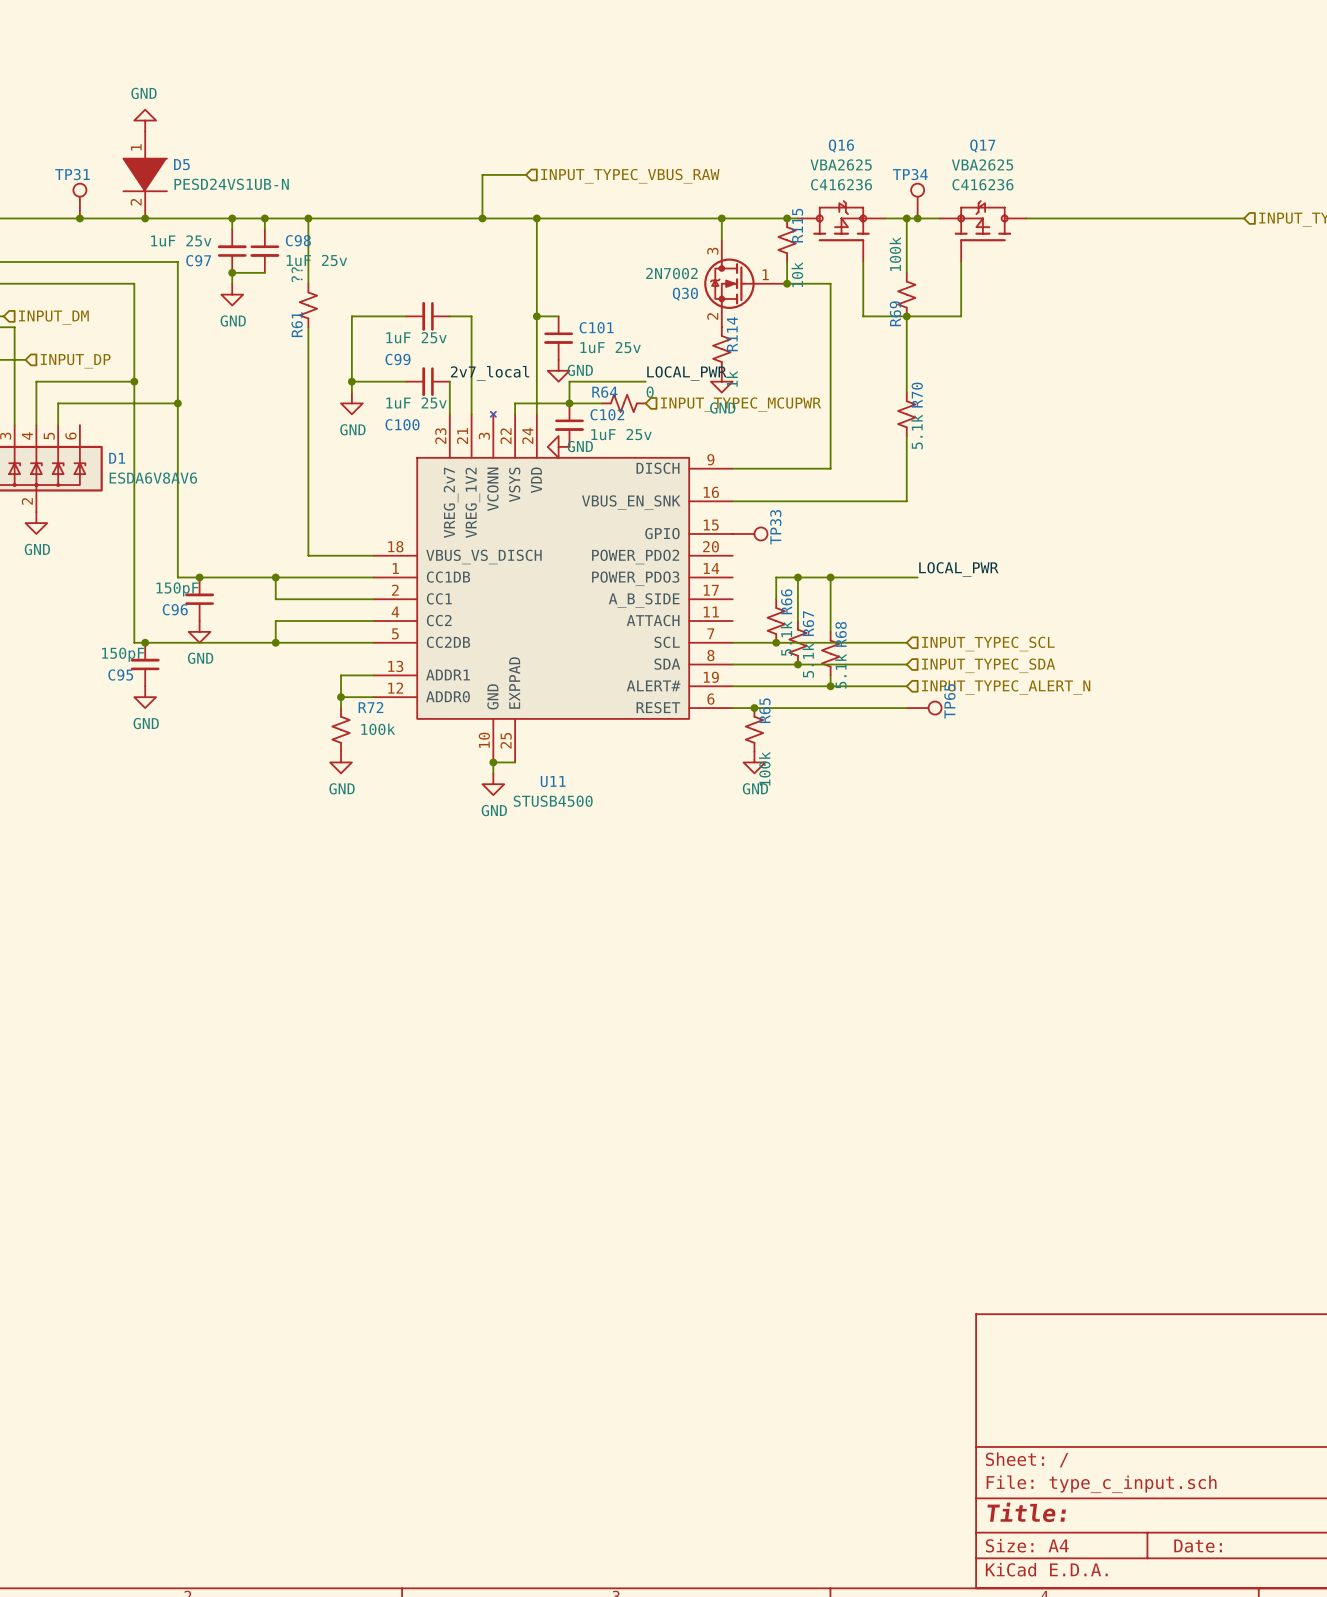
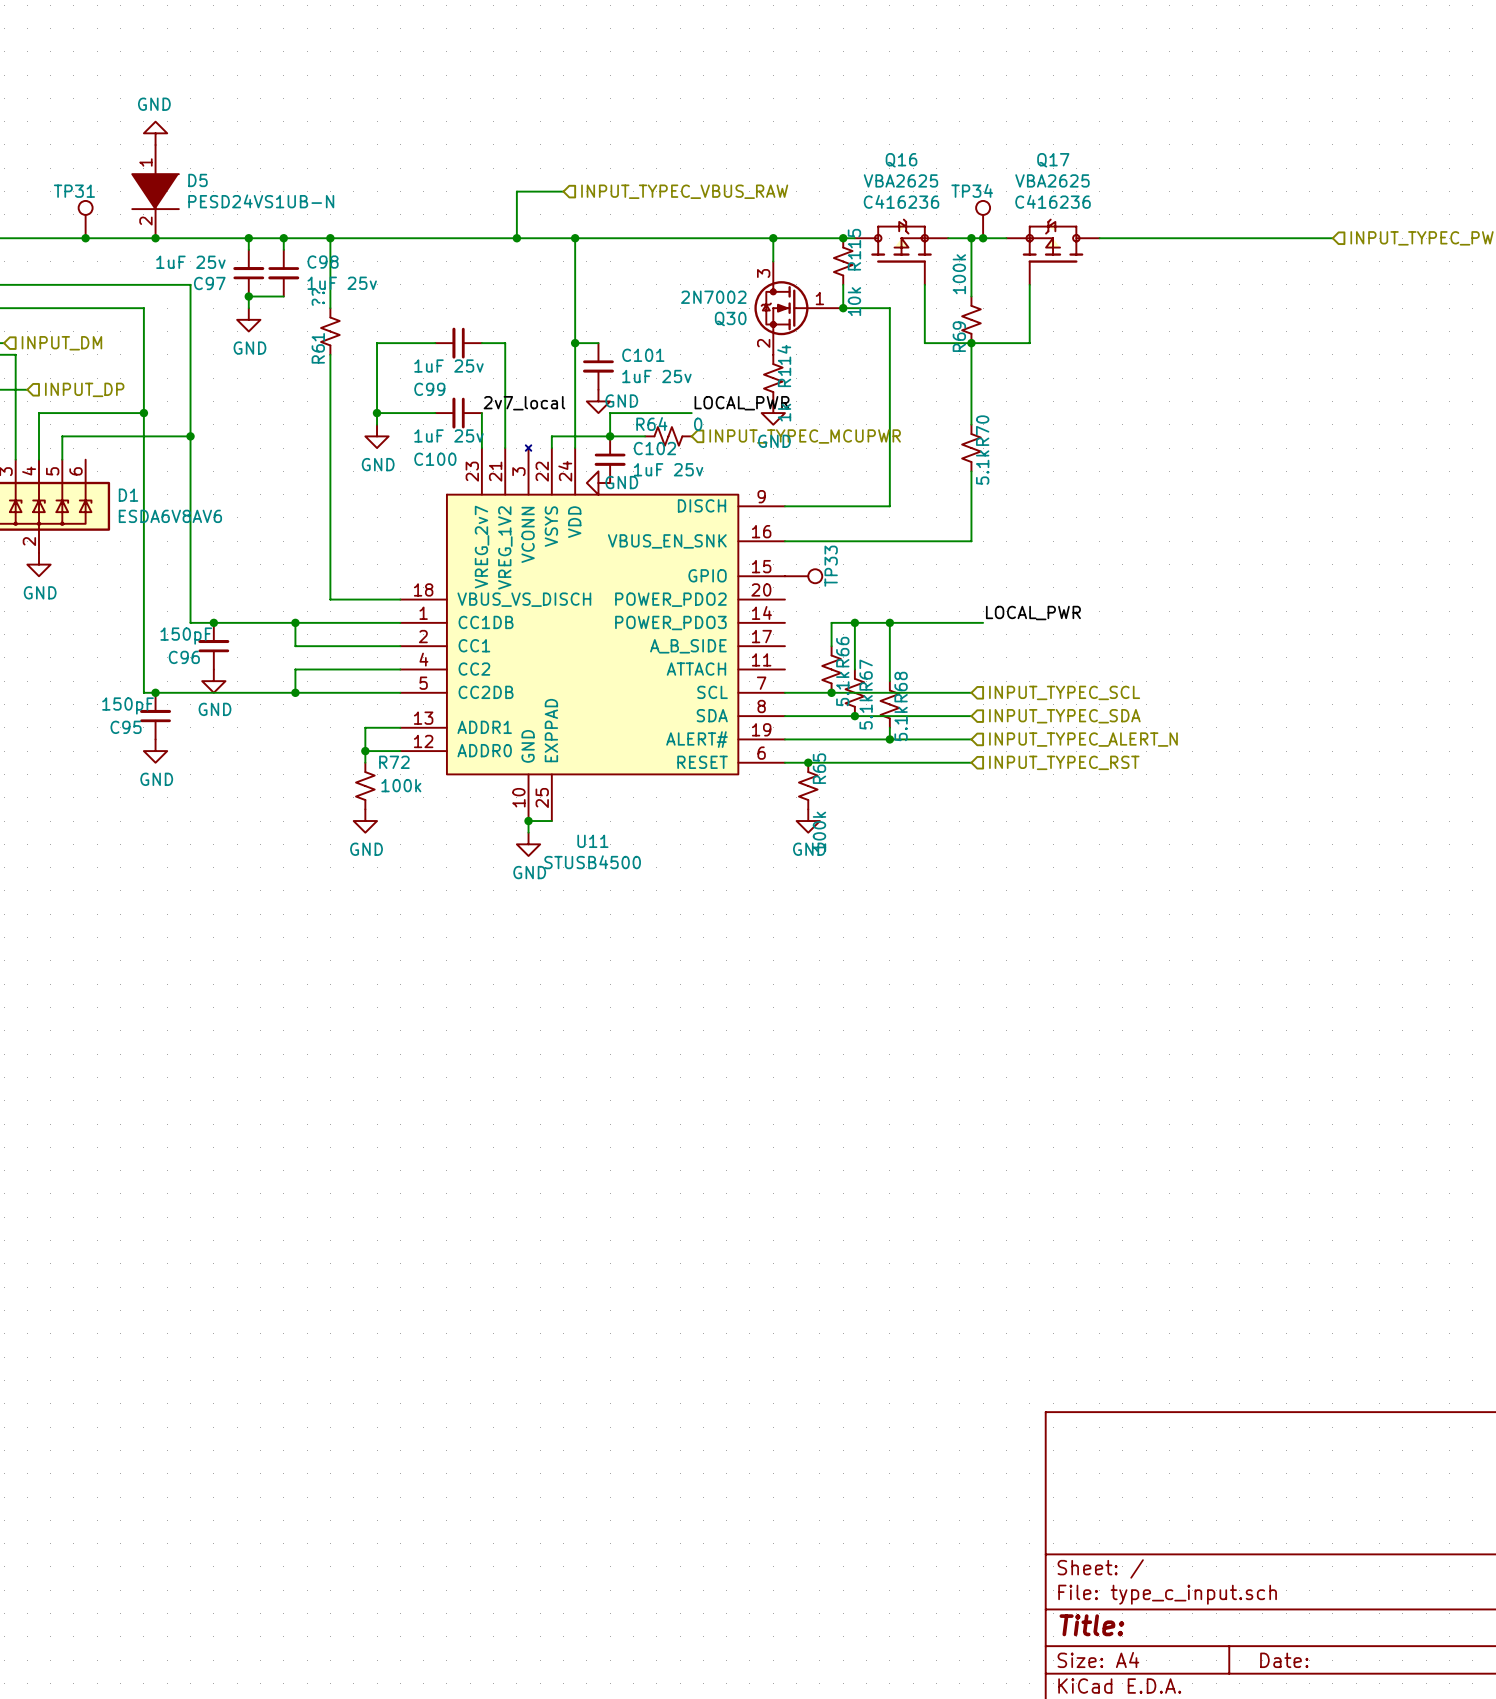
TP65: (924, 708) -> none
hierarchical label: none -> INPUT_TYPEC_RST (1064, 762)

